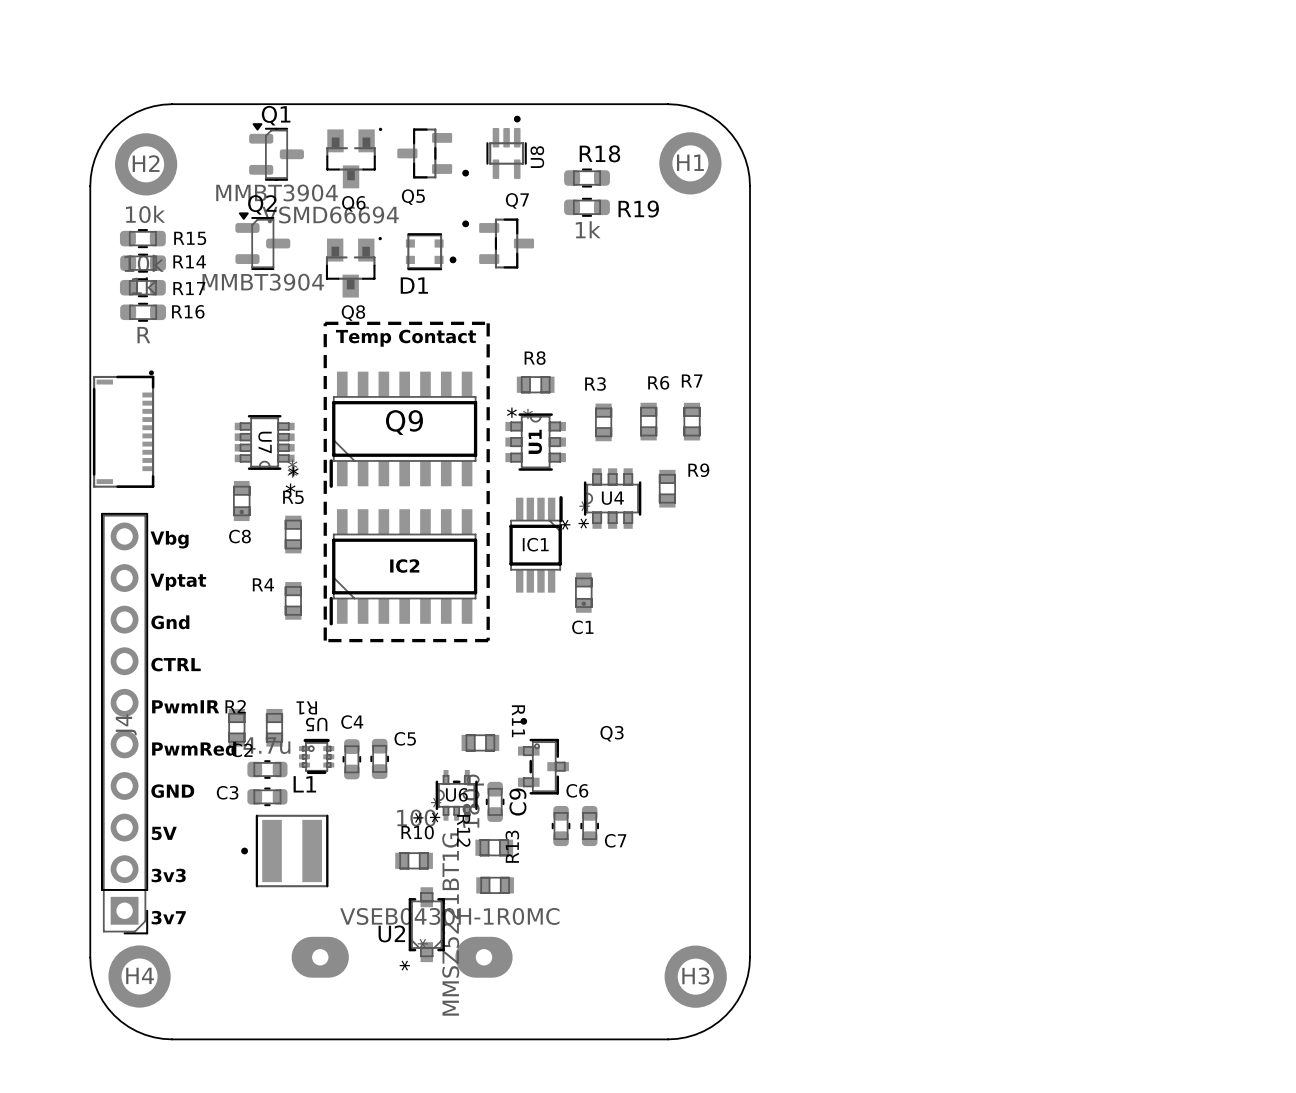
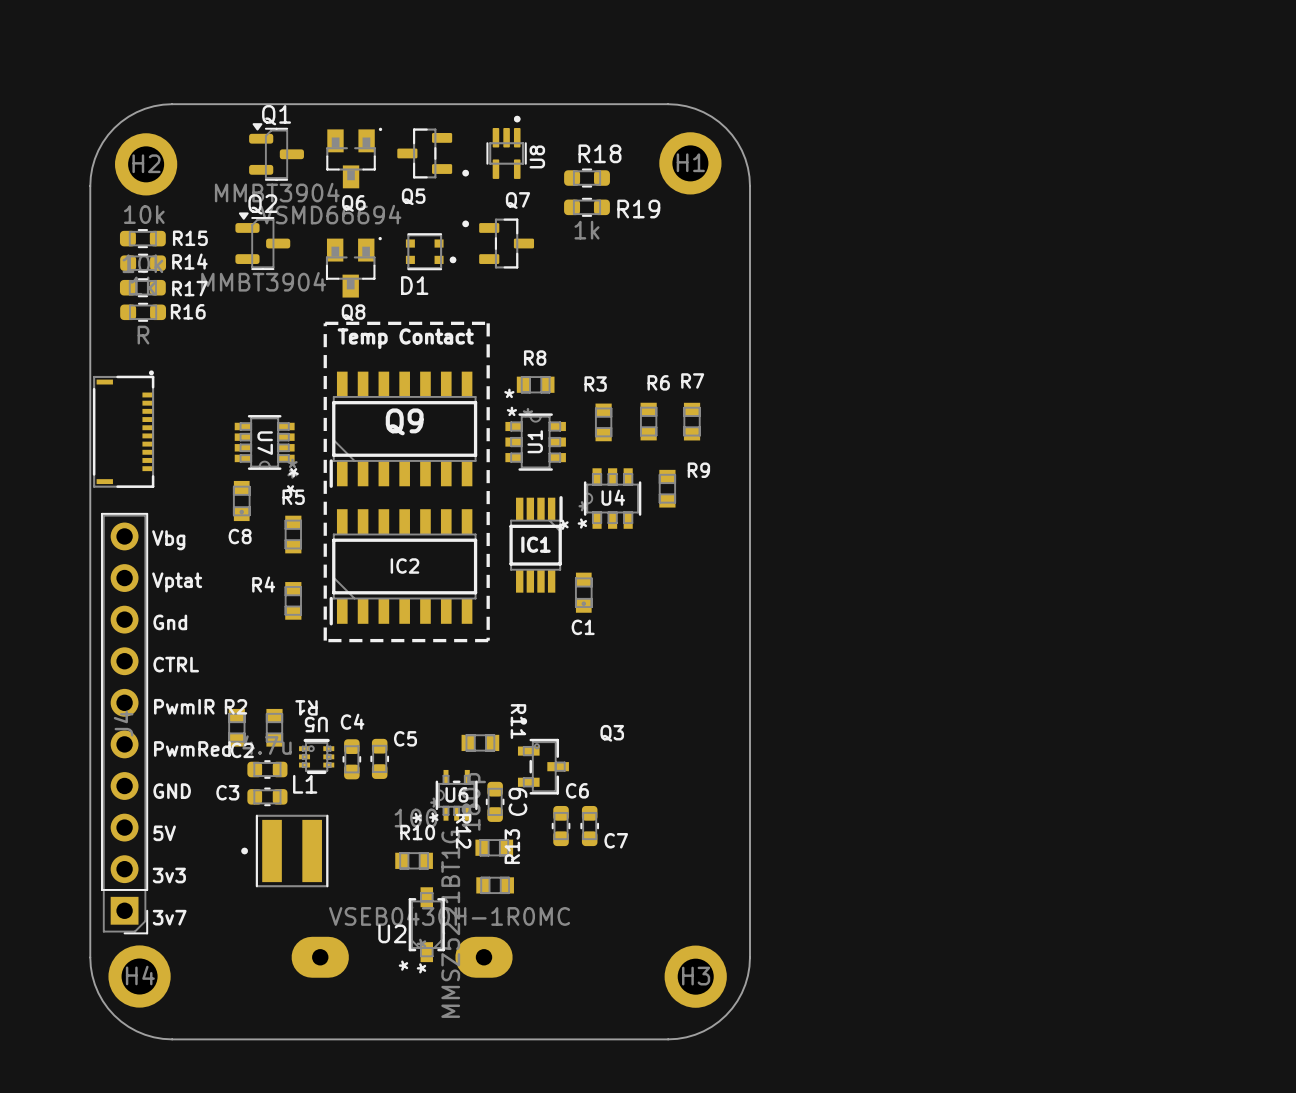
U1 text: none -> * (509, 393)
U2 text: none -> * (421, 968)

